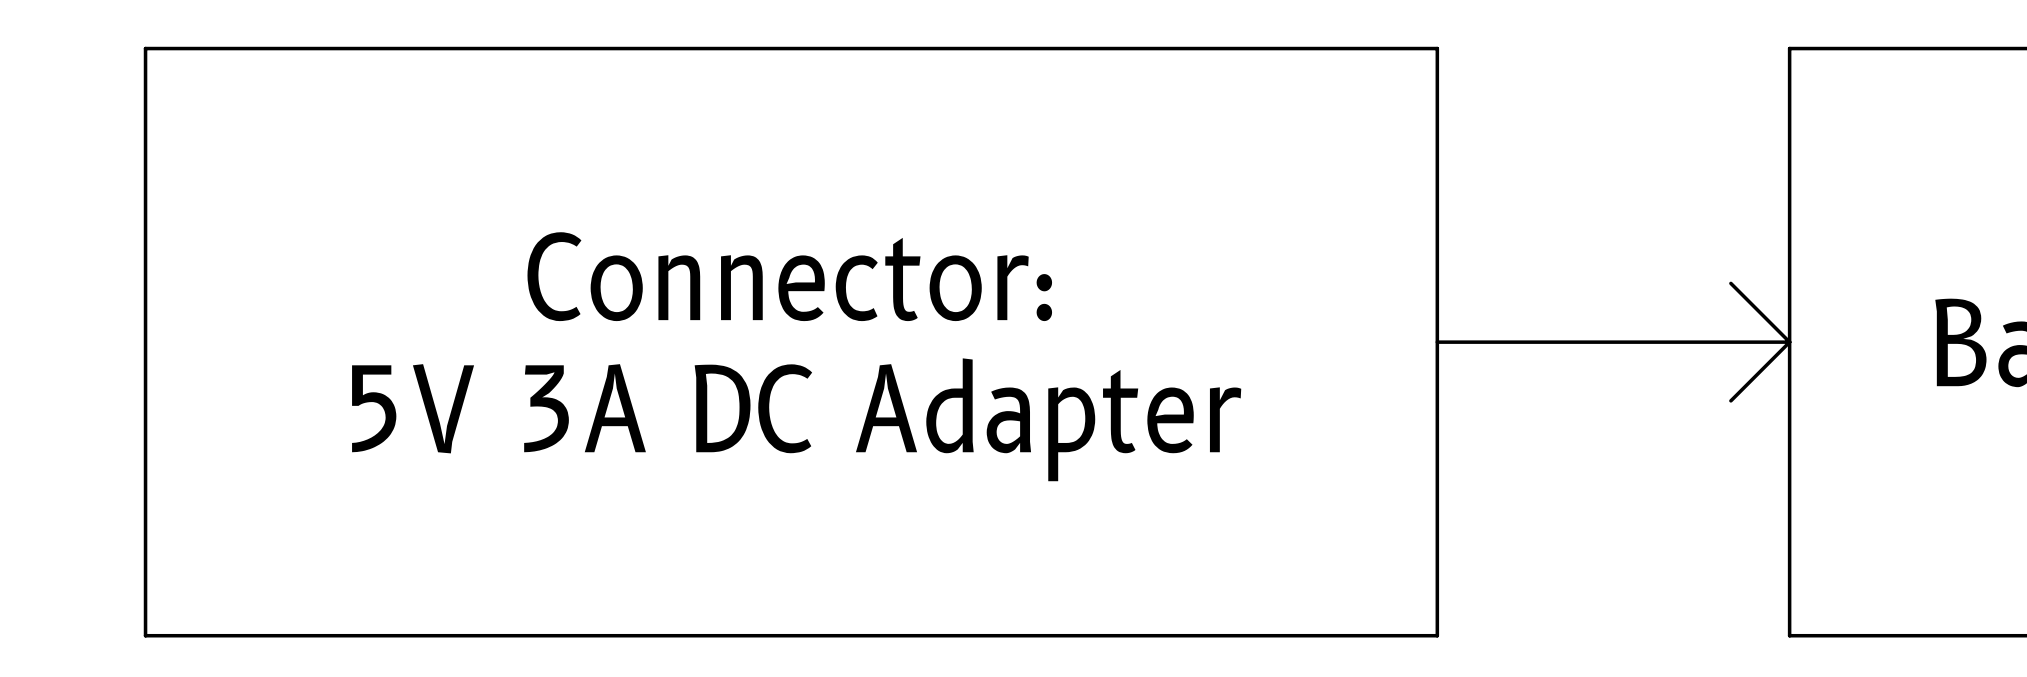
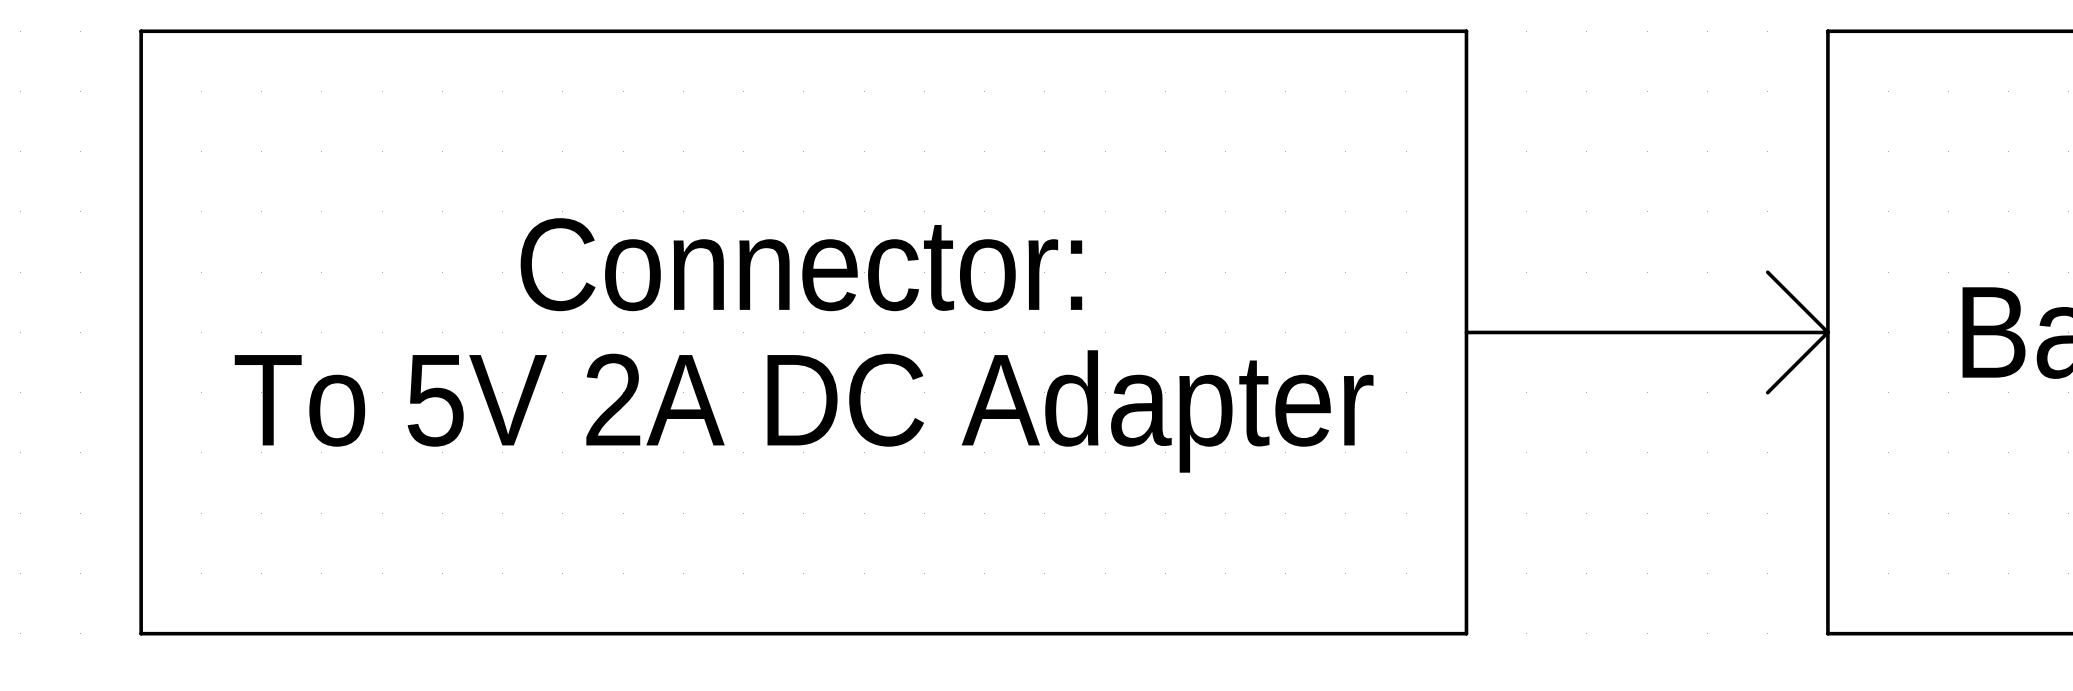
text: 5V 3A DC Adapter (796, 419) -> To 5V 2A DC Adapter (804, 411)

